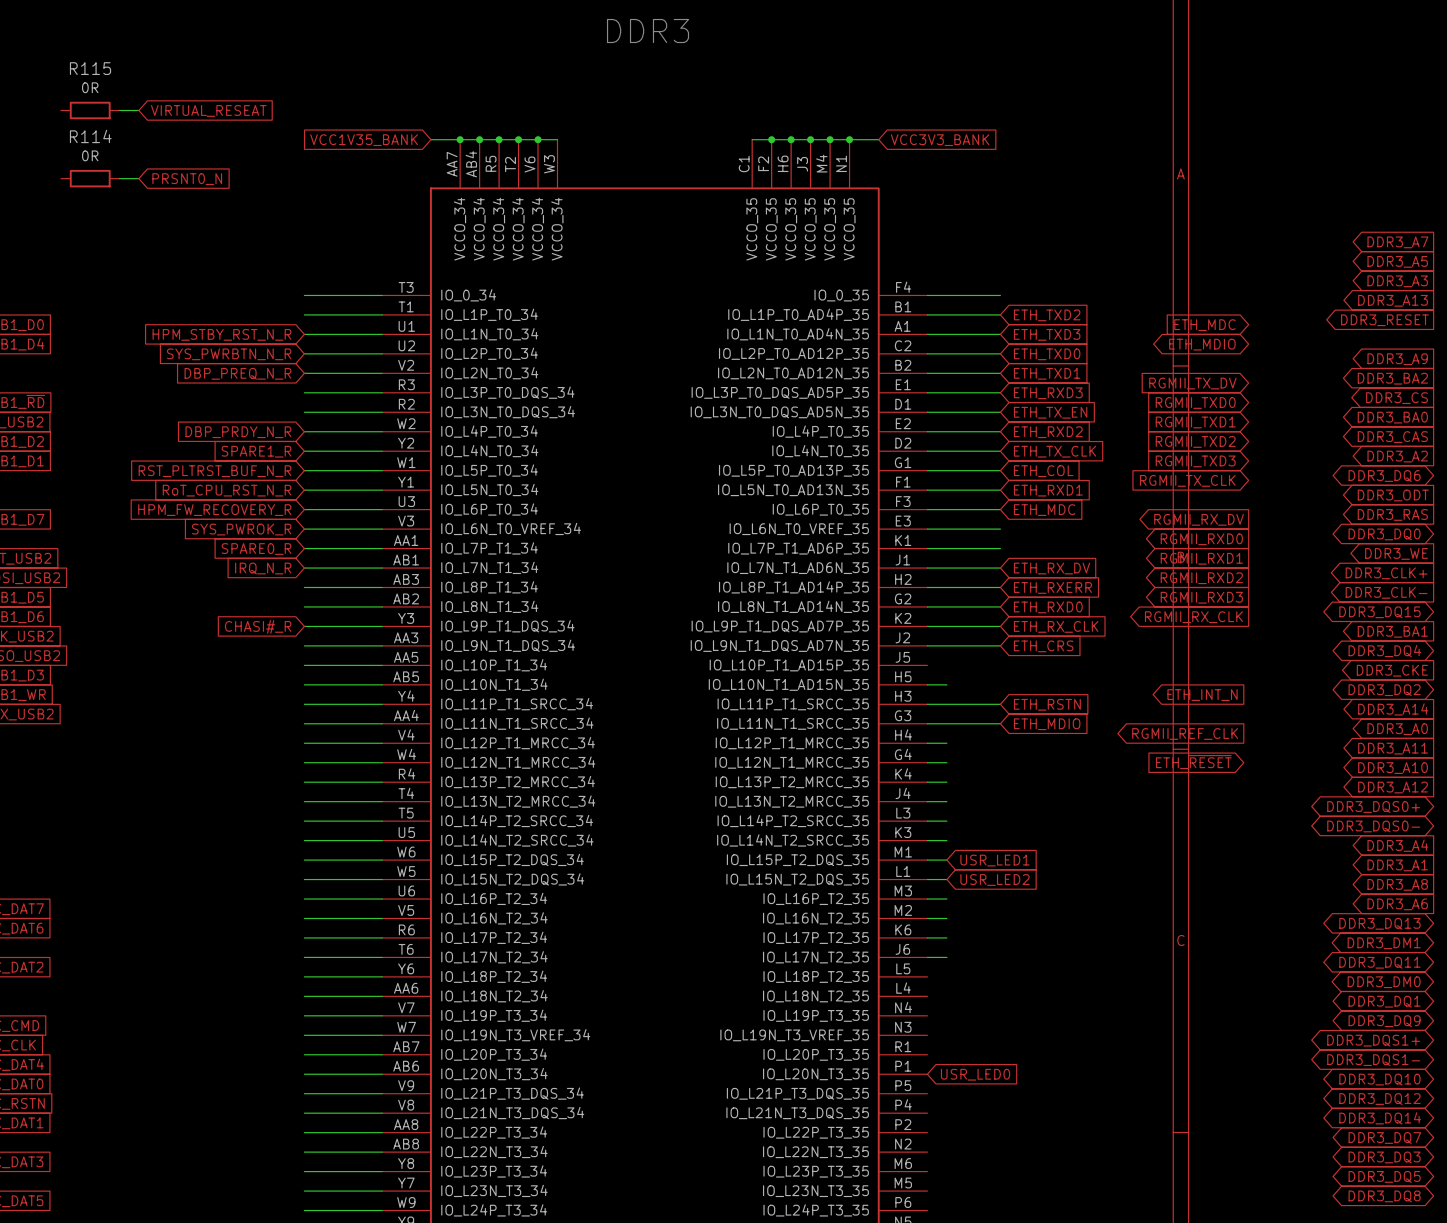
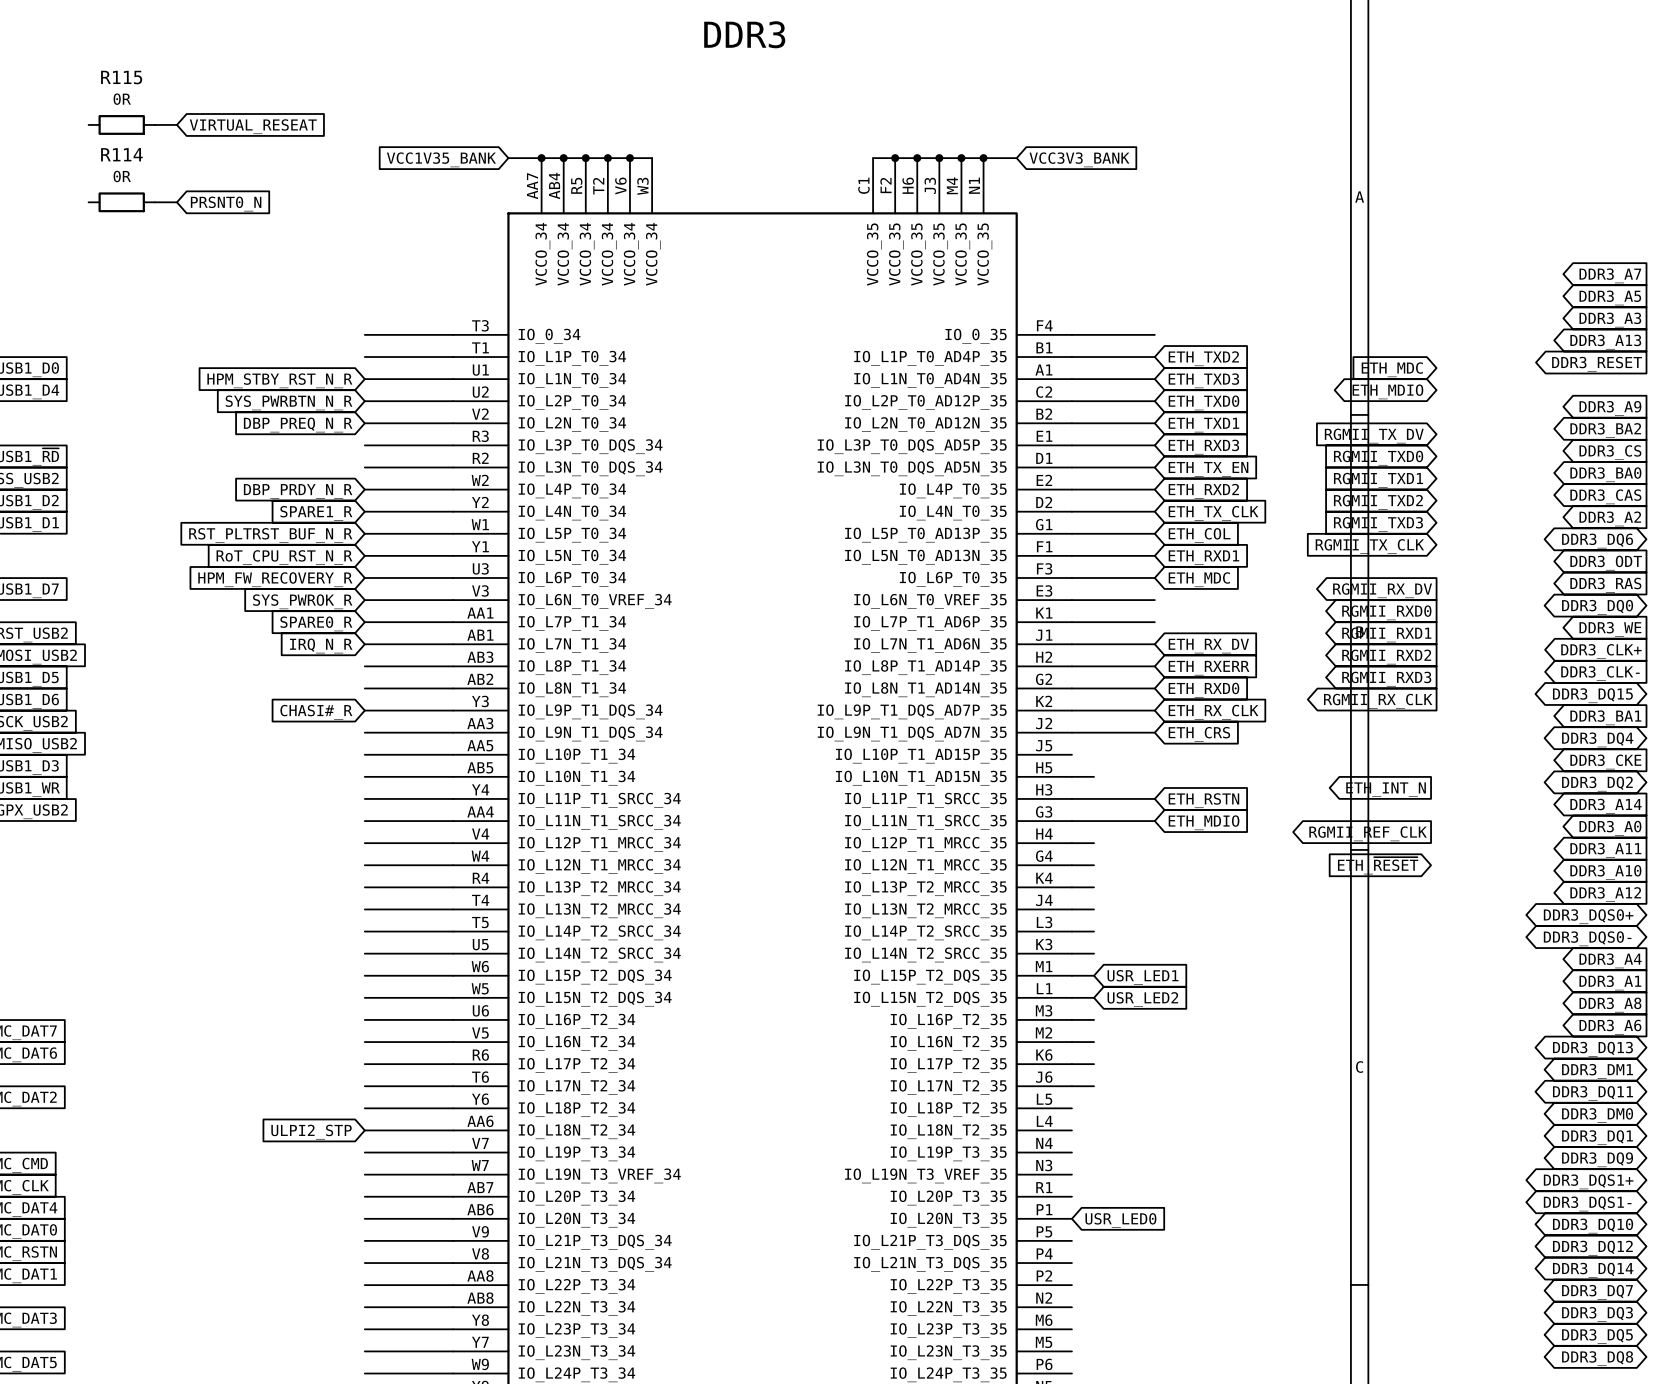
global label: none -> ULPI2_STP (311, 1132)

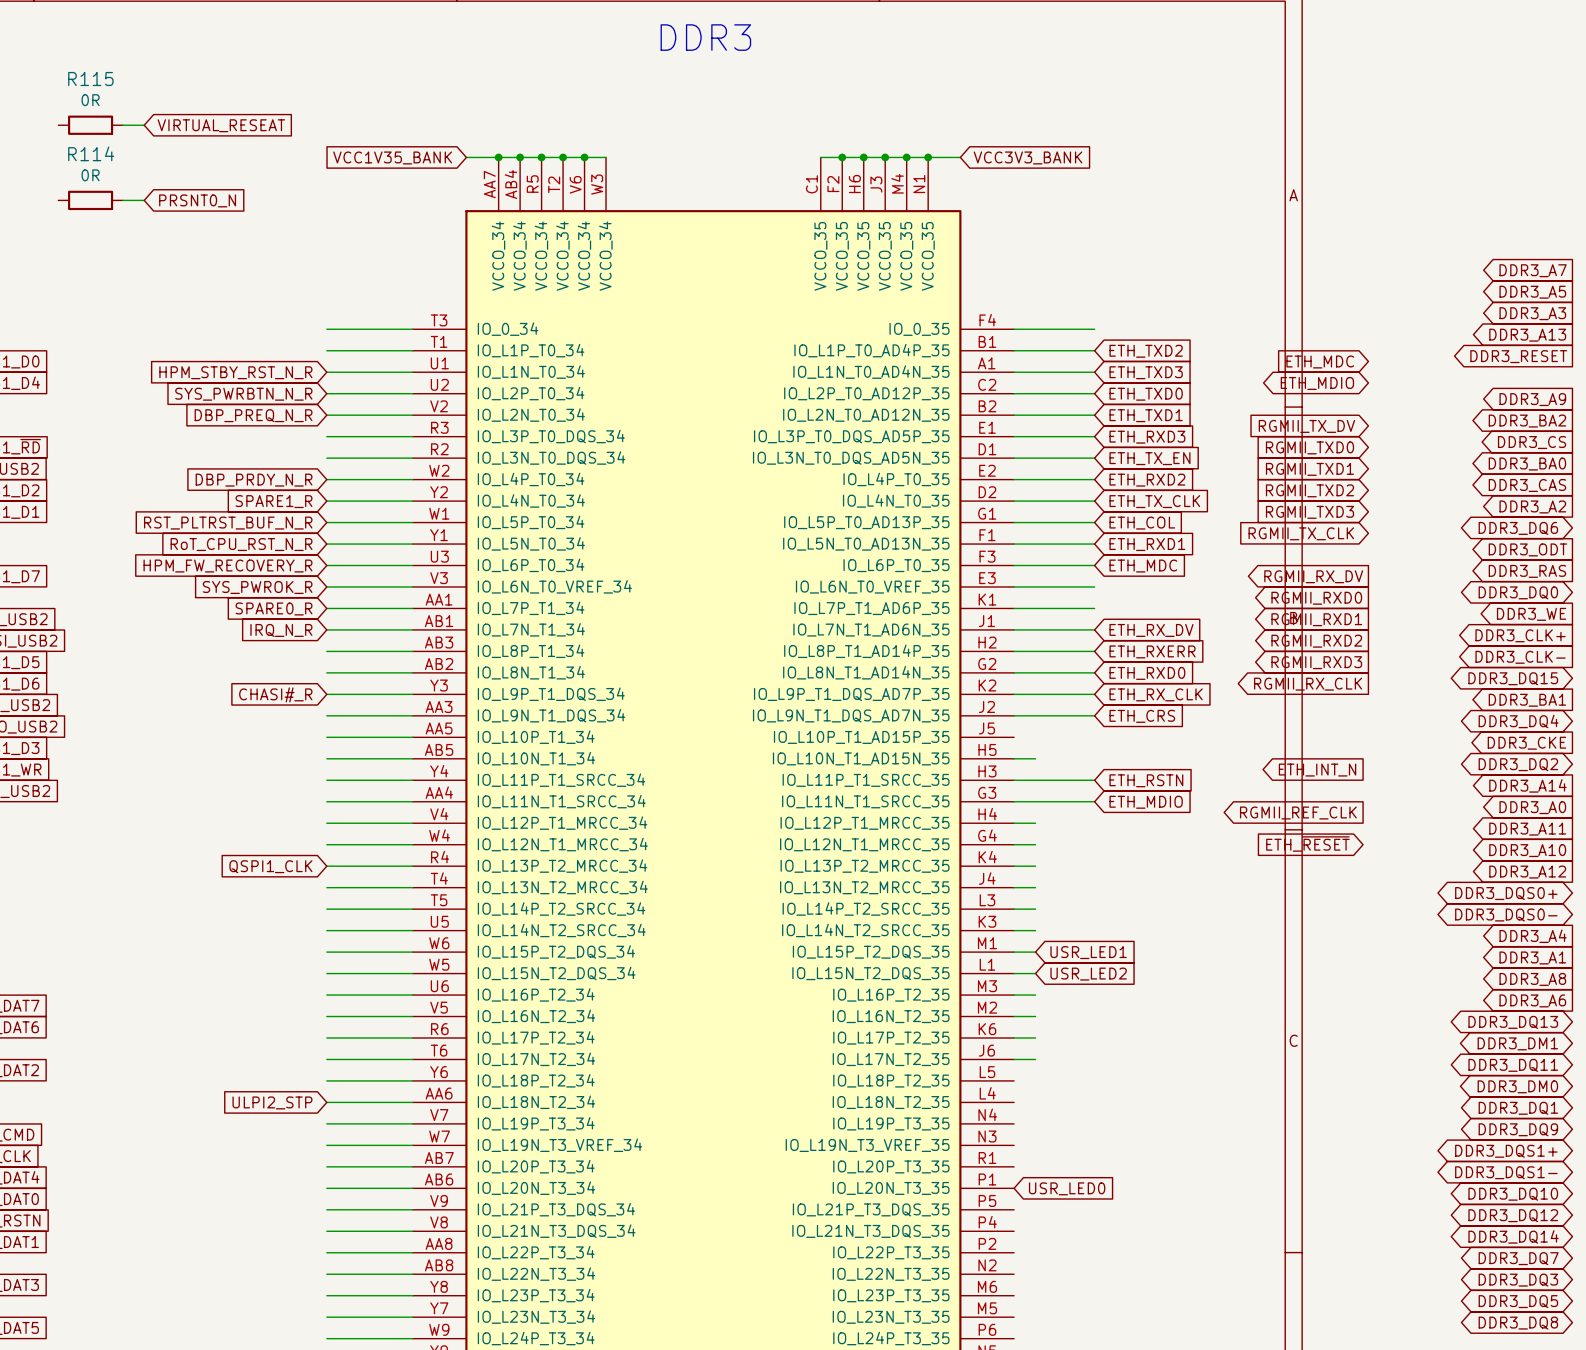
global label: none -> QSPI1_CLK (270, 866)

